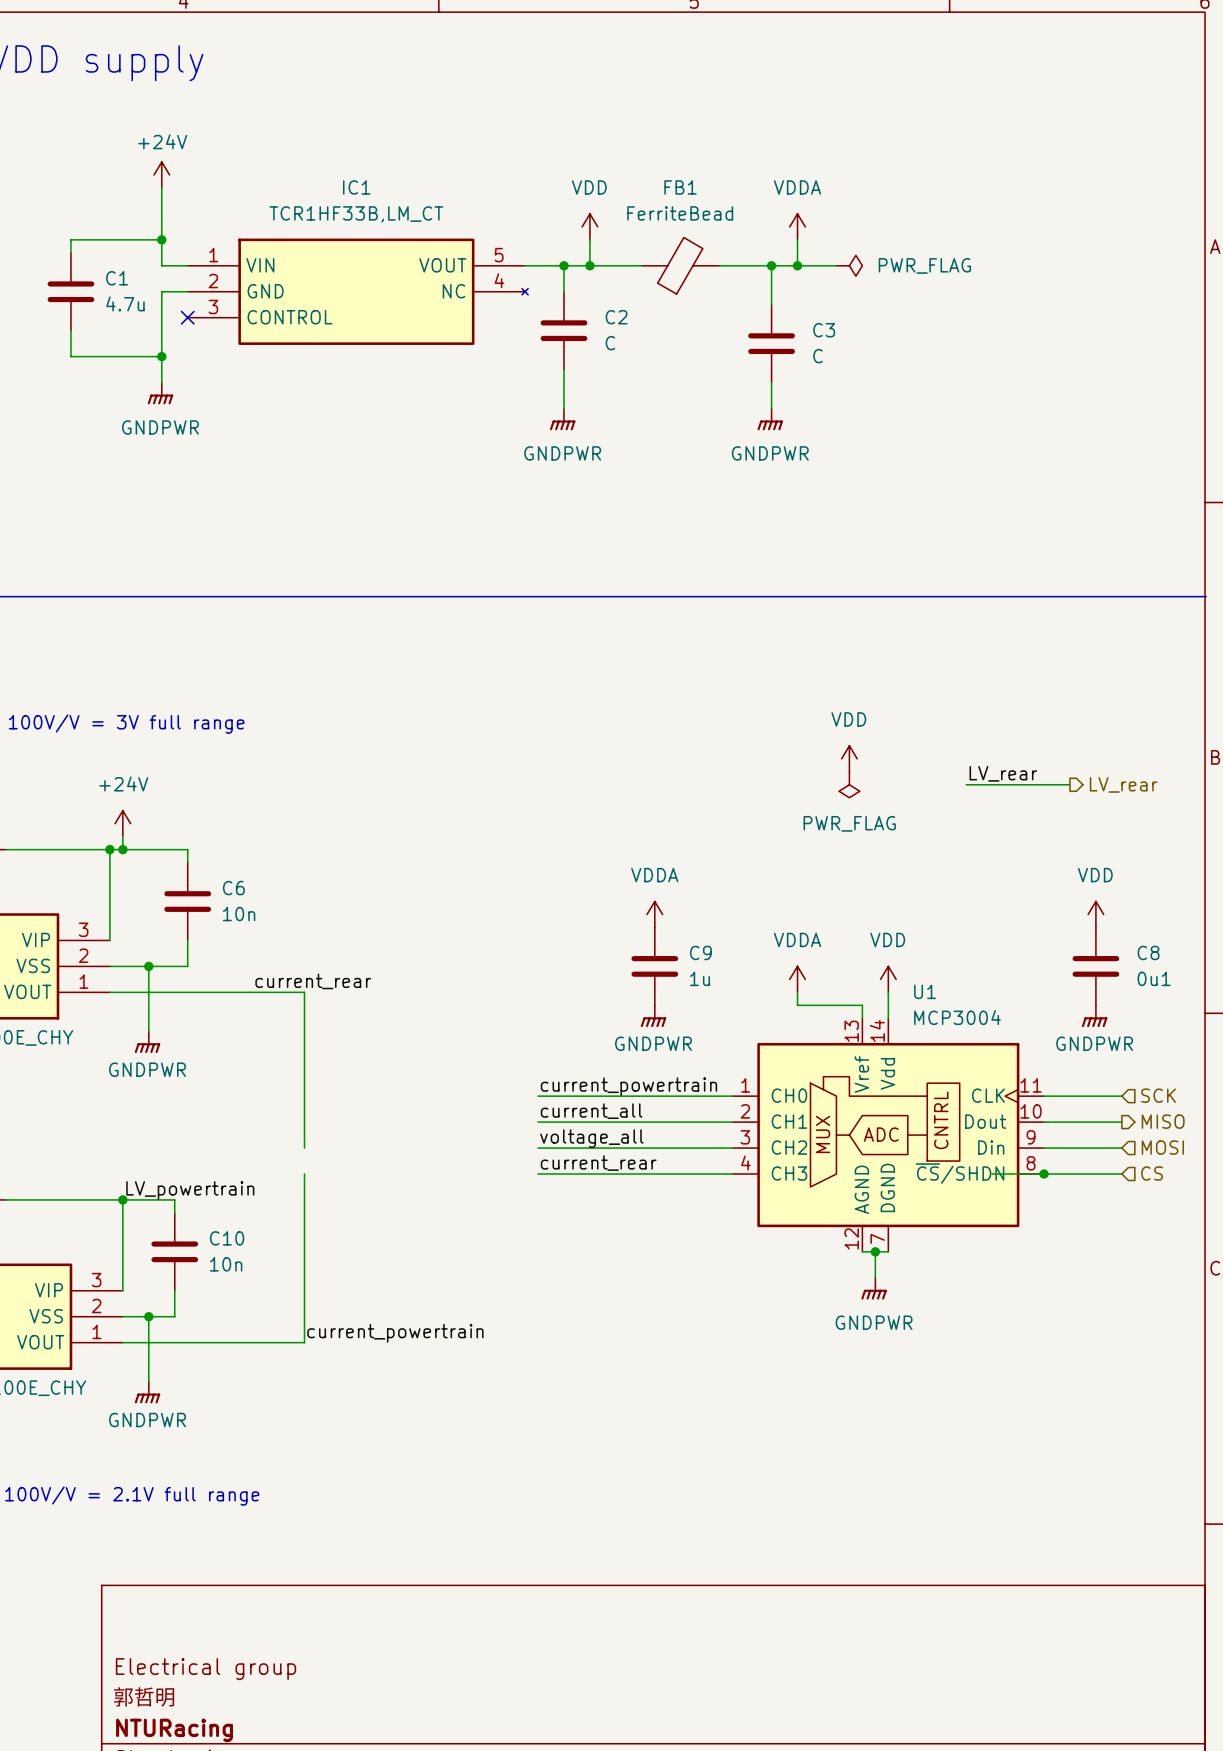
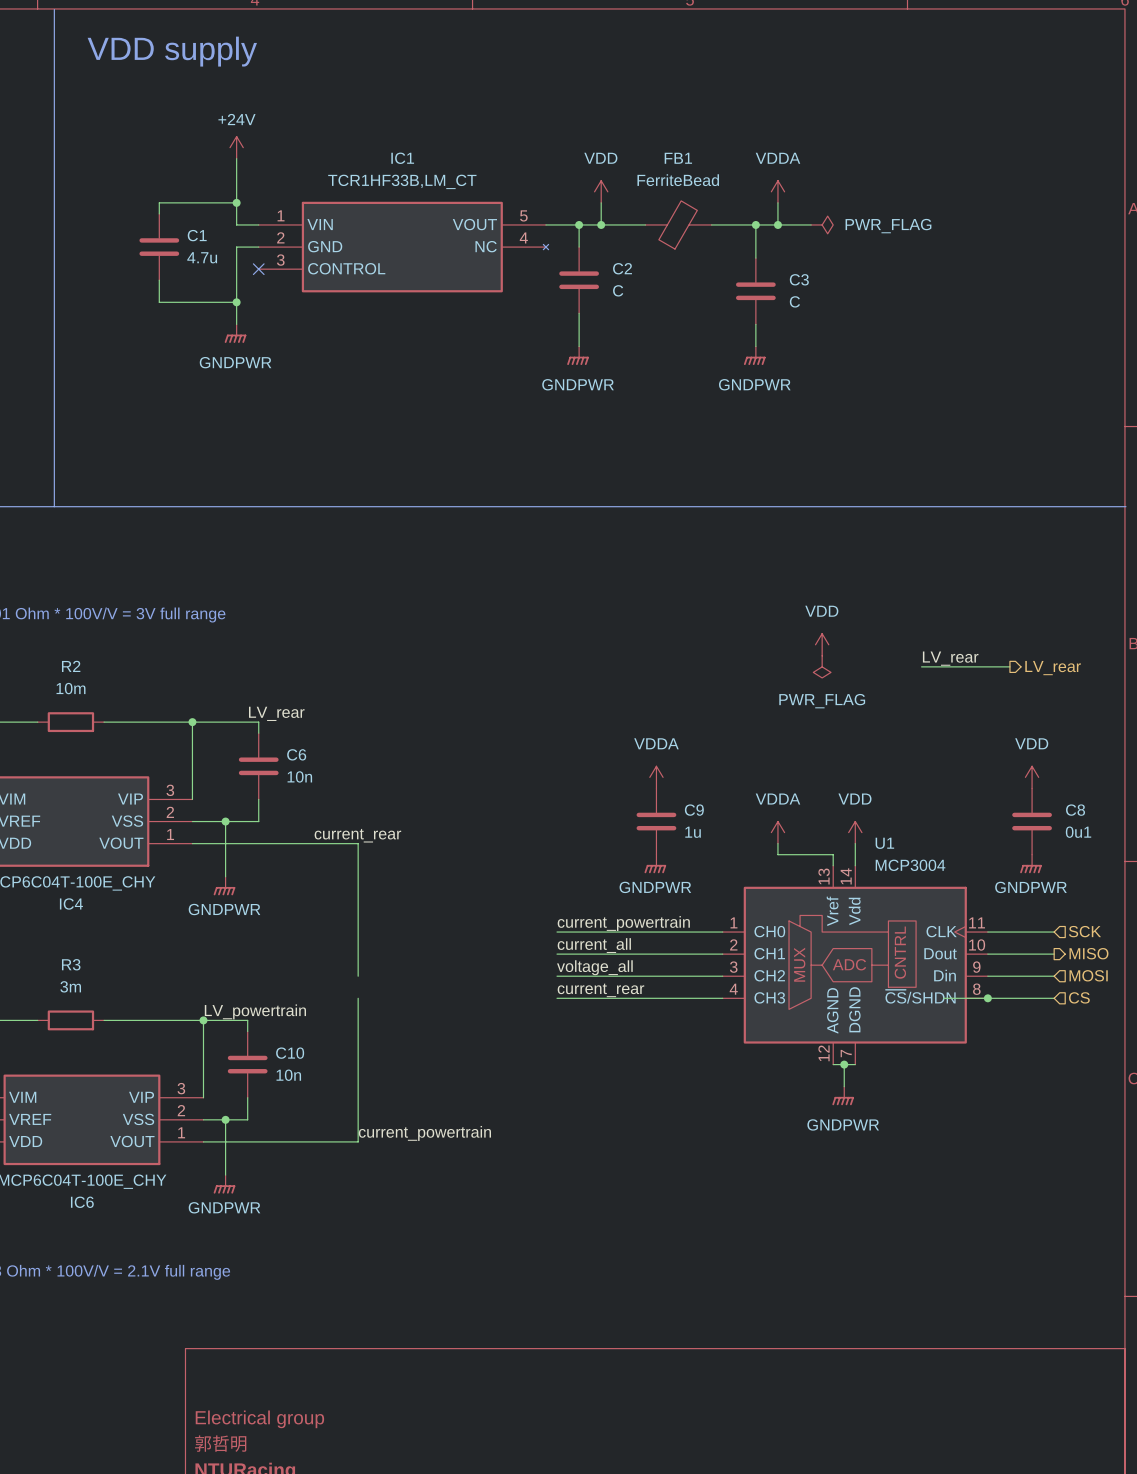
power symbol: +24V (122, 823) -> none
wire: (122, 836) (122, 849) -> none
label: none -> LV_rear (276, 713)
junction: (122, 849) -> none

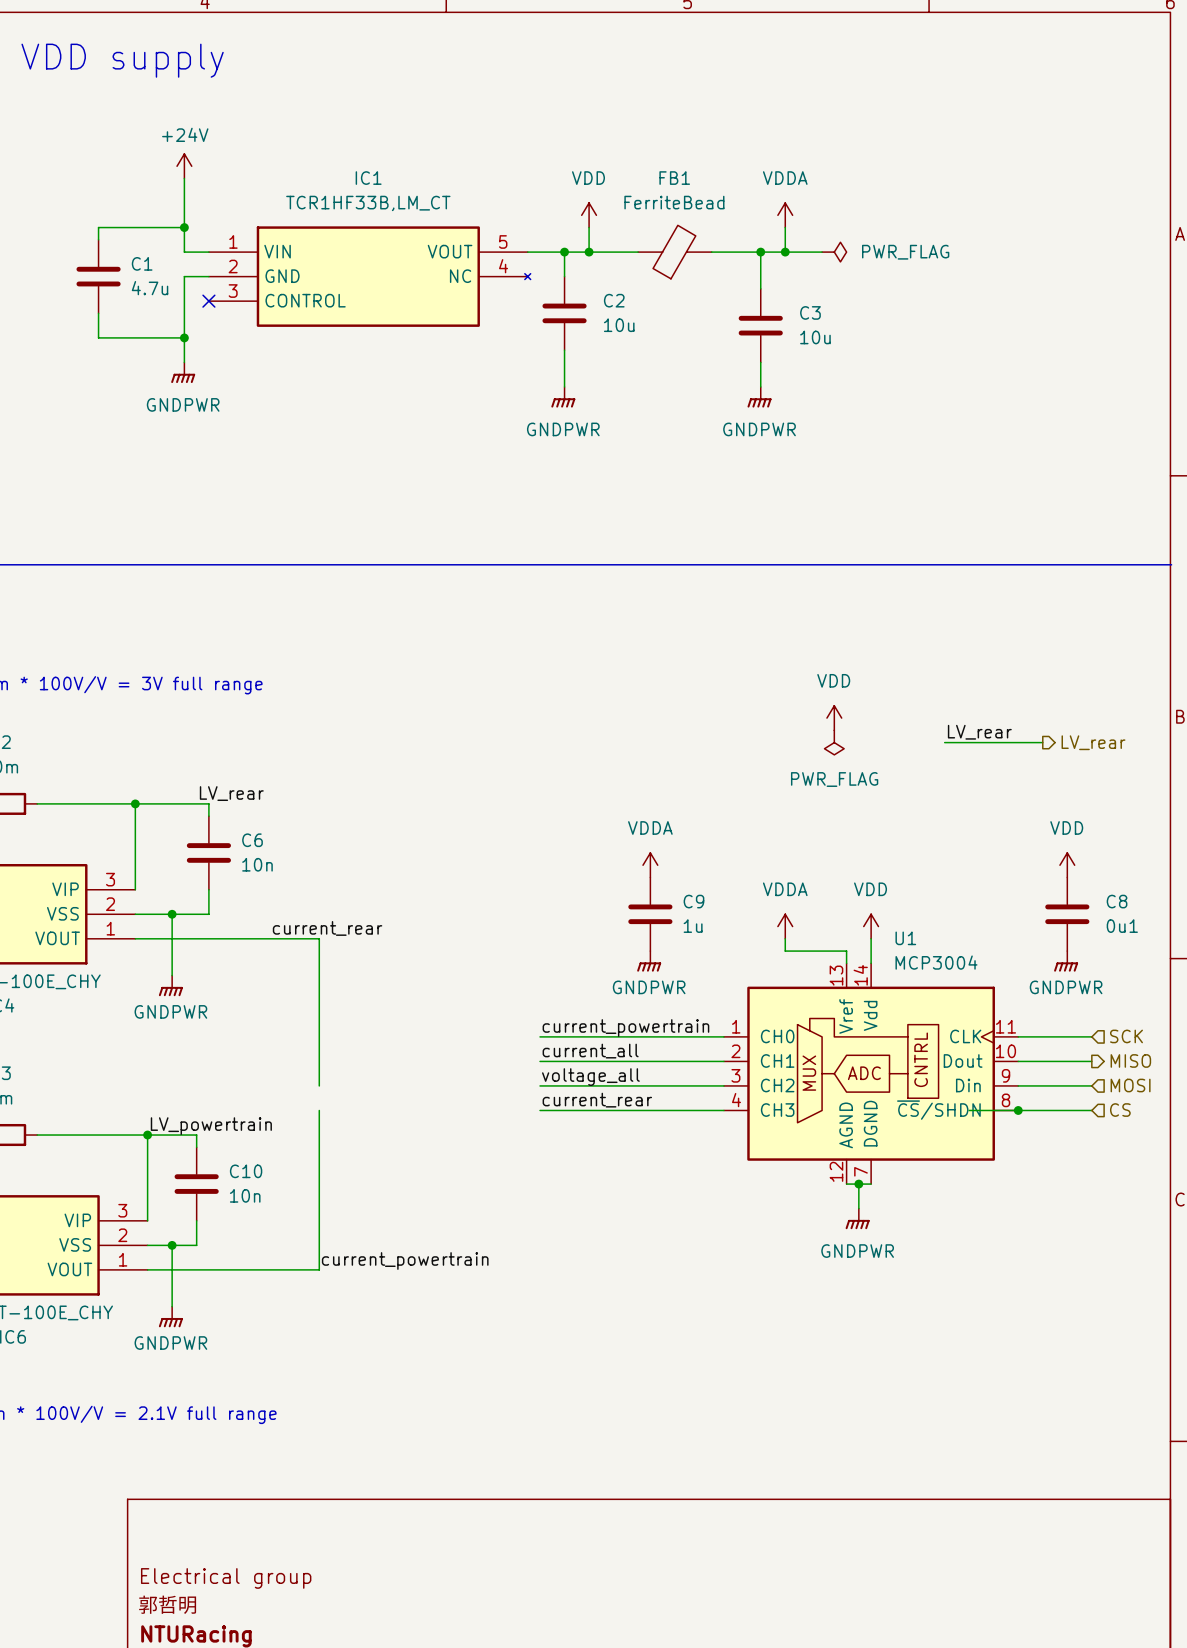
C2 value: C (618, 290) -> 10u (619, 325)
C3 value: C (794, 301) -> 10u (815, 337)

